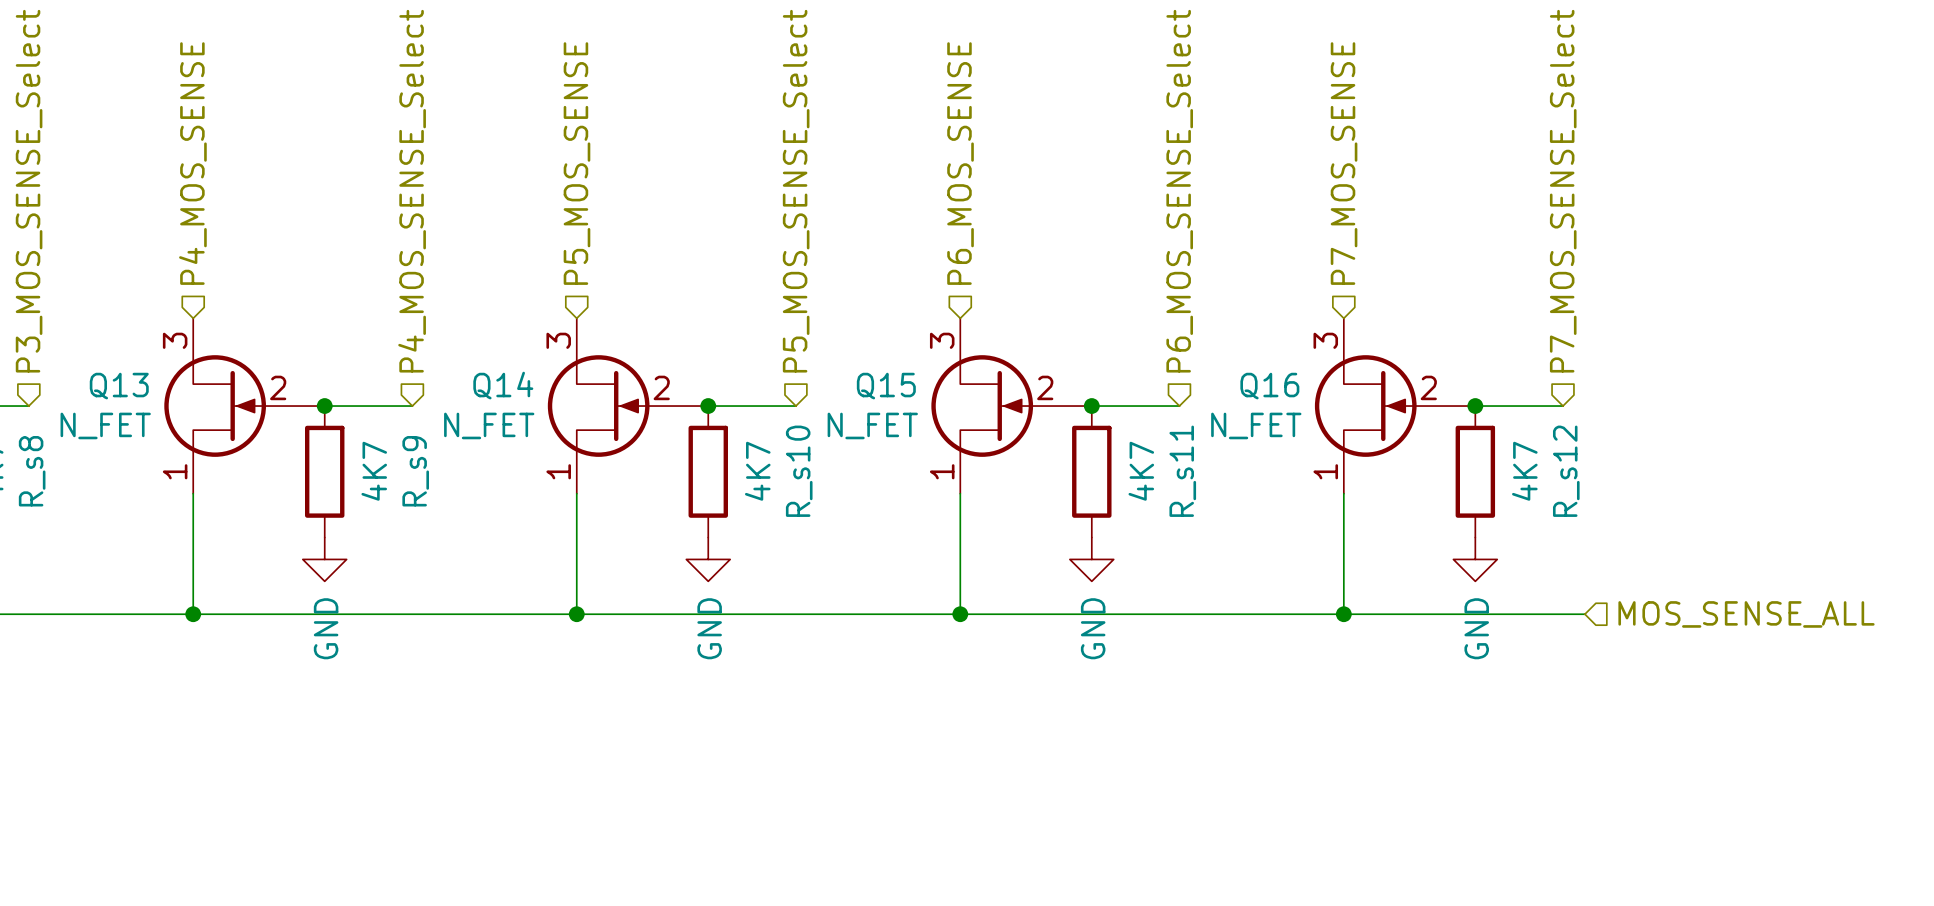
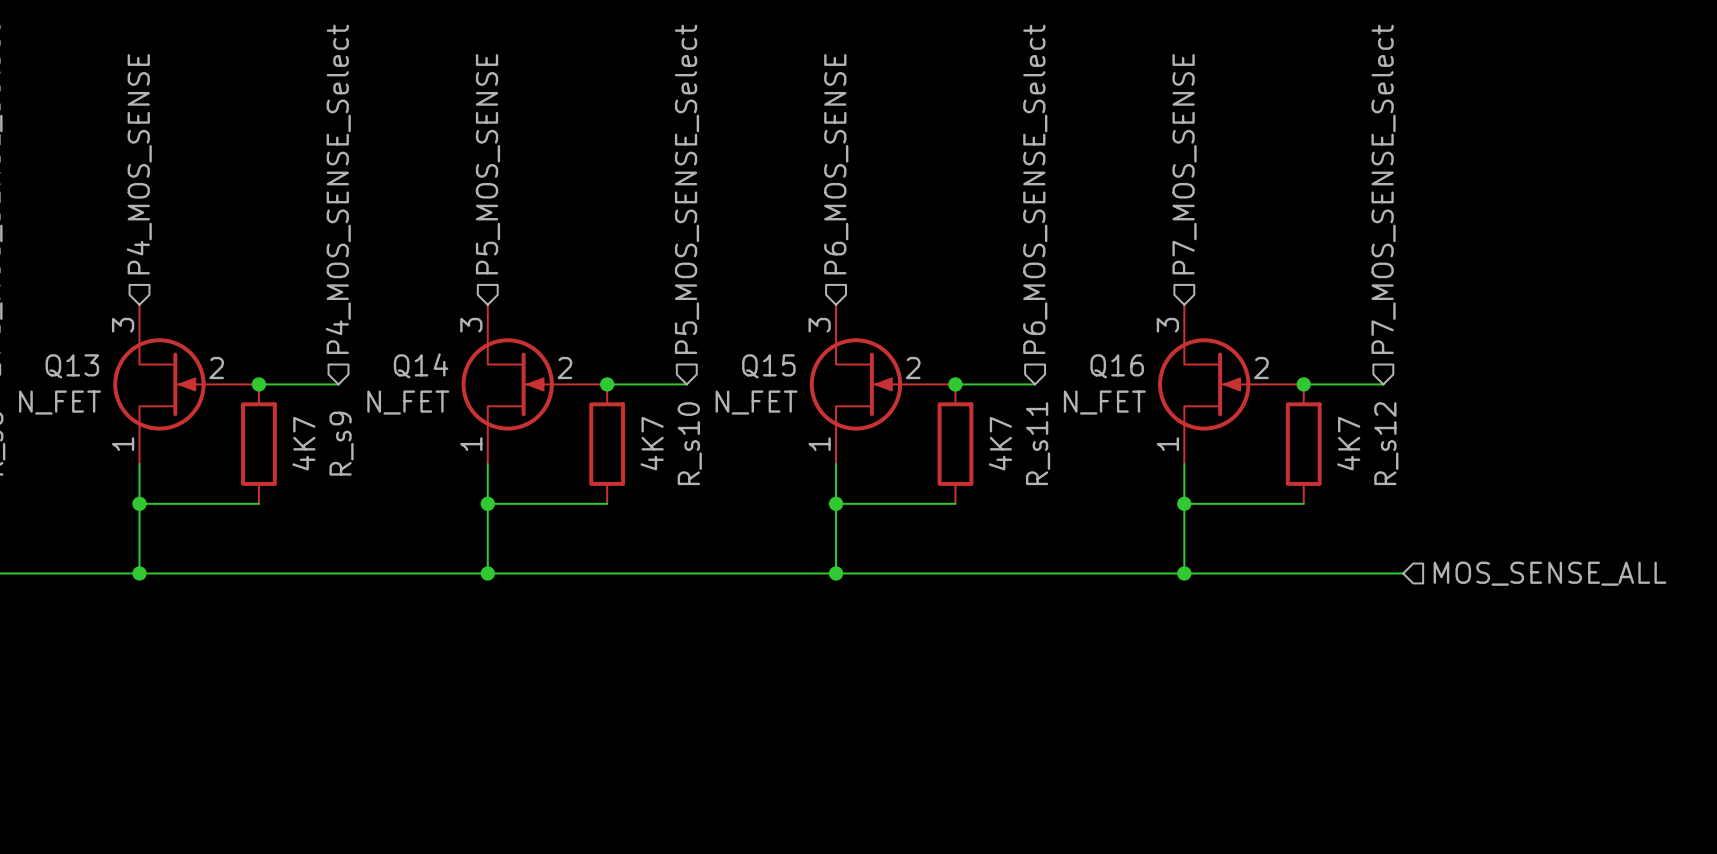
wire: none -> (139, 503) (258, 503)
junction: none -> (139, 503)
wire: none -> (487, 503) (607, 503)
junction: none -> (487, 503)
wire: none -> (836, 503) (955, 503)
junction: none -> (836, 503)
wire: none -> (1184, 503) (1303, 503)
junction: none -> (1184, 503)
power symbol: GND (324, 559) -> none
power symbol: GND (708, 559) -> none
power symbol: GND (1091, 559) -> none
power symbol: GND (1475, 559) -> none

